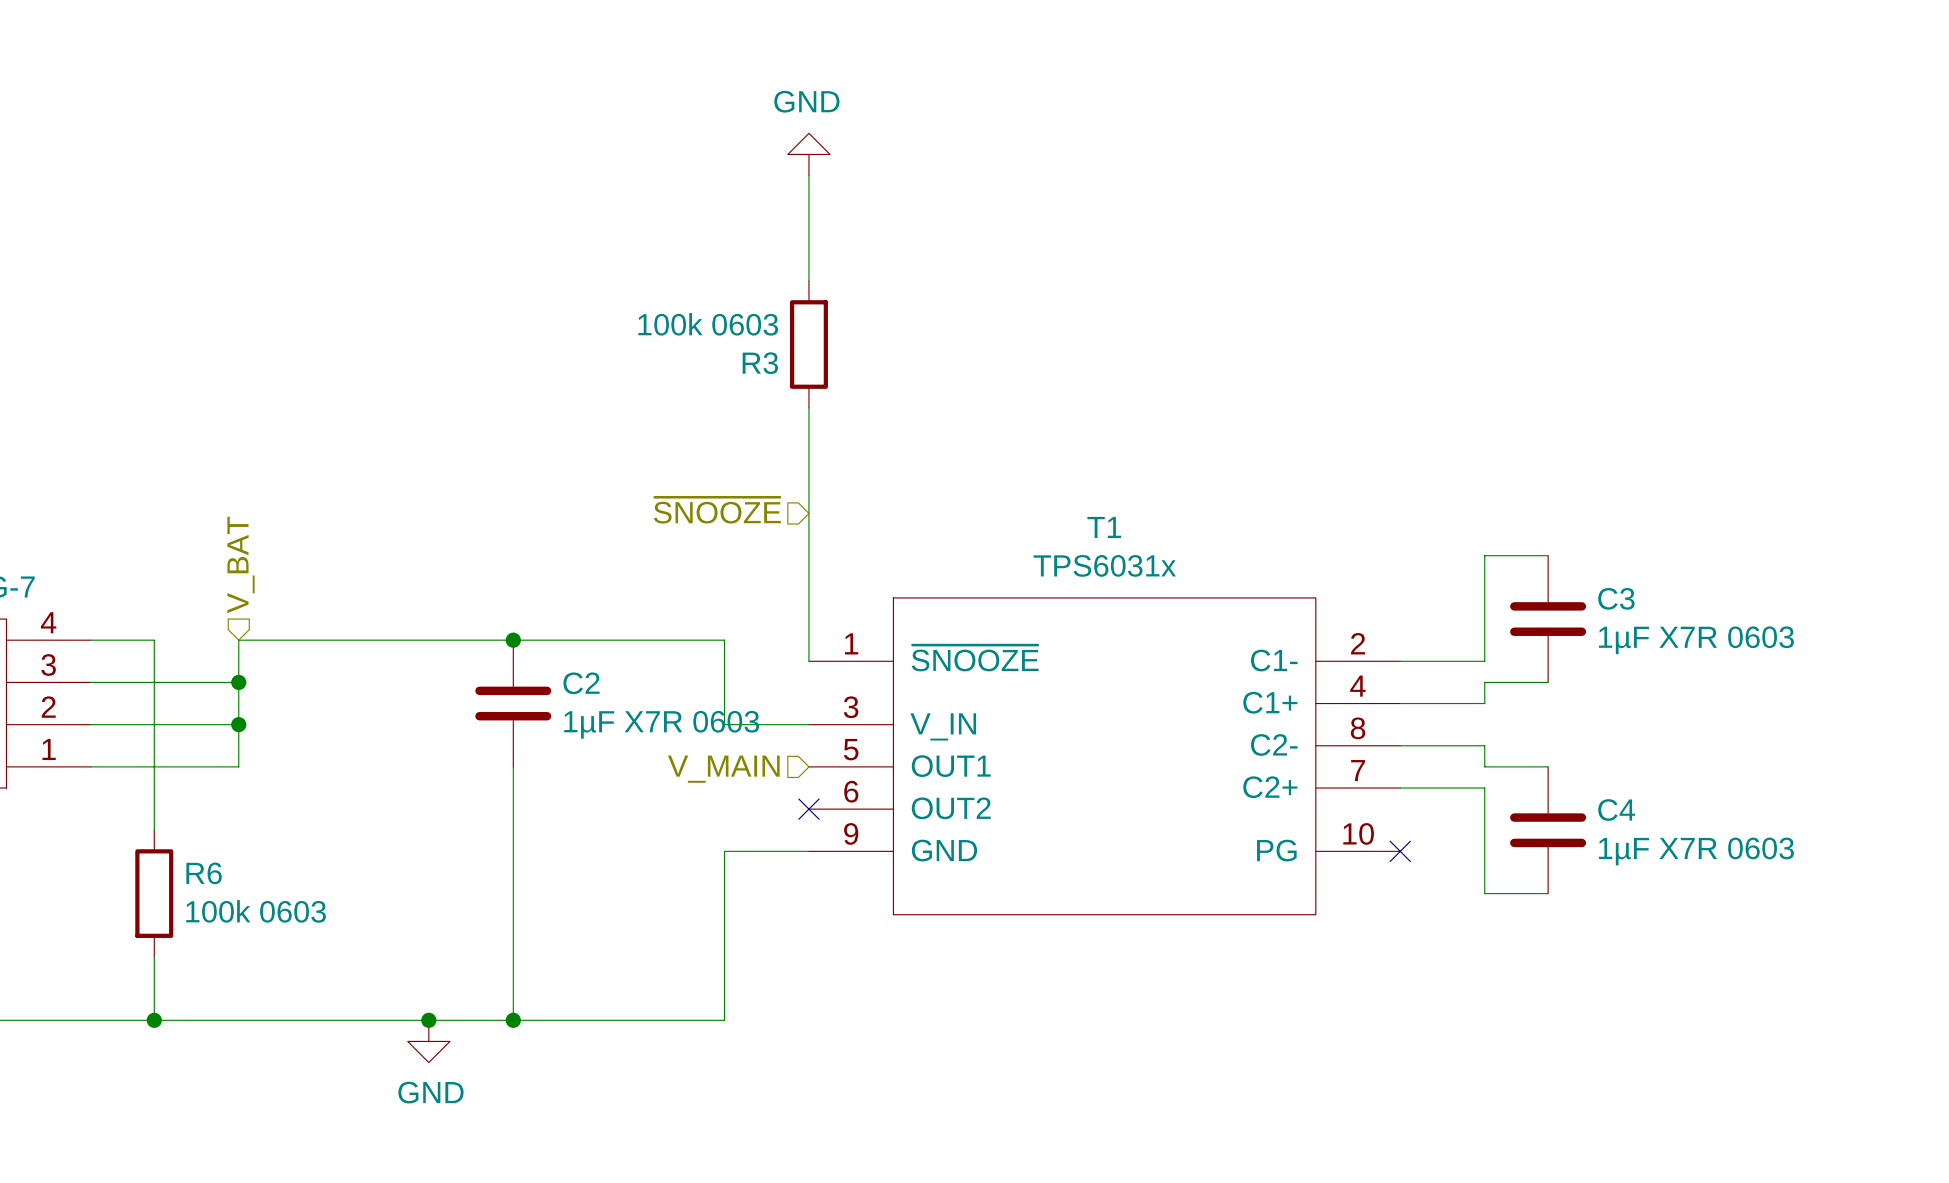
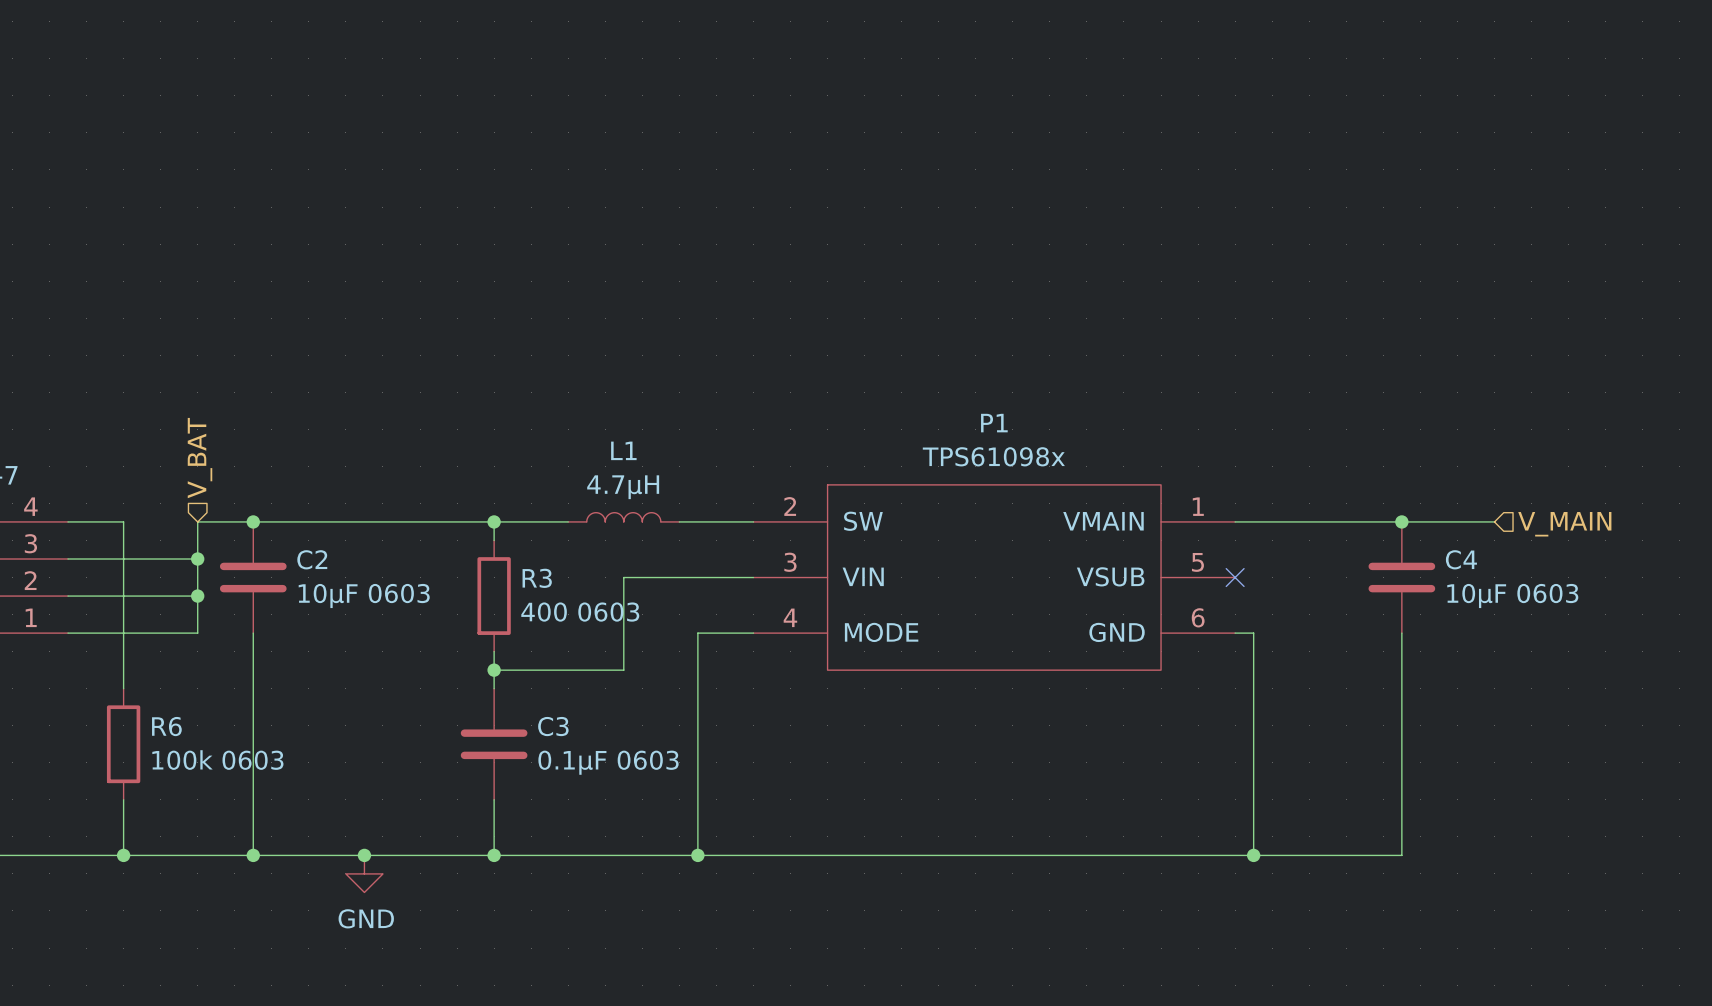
power symbol: GND (808, 154) -> none
wire: (808, 175) (808, 281) -> none
R3 value: 100k 0603 (708, 324) -> 400 0603 (580, 612)
R3 position: (808, 344) -> (494, 596)
R3 name position: R3 (760, 363) -> R3 (537, 578)
wire: (808, 407) (808, 661) -> none
hierarchical label: ~{SNOOZE} (717, 510) -> none
wire: (1548, 555) (1484, 555) (1484, 661) (1400, 661) -> none
C3 position: (1548, 619) -> (494, 744)
L1: none -> 4.7µH (623, 517)
junction: none -> (253, 521)
junction position: (513, 640) -> (494, 521)
wire: none -> (494, 521) (494, 540)
wire: (661, 640) (724, 640) (724, 703) -> (753, 577) (623, 577)
wire: none -> (679, 521) (753, 521)
wire: none -> (1235, 521) (1494, 521)
junction: none -> (1401, 521)
C3 value: 1µF X7R 0603 (1696, 640) -> 0.1µF 0603 (608, 762)
hierarchical label: none -> V_MAIN (1564, 524)
wire: (1548, 682) (1484, 682) (1484, 703) (1400, 703) -> none
C2 position: (513, 703) -> (253, 577)
P1: none -> TPS61098x (994, 577)
no-connect mark: none -> (1235, 577)
C2 value: 1µF X7R 0603 (661, 724) -> 10µF 0603 (364, 595)
wire: (724, 724) (808, 724) -> (623, 596) (623, 670) (494, 670)
wire: (1400, 745) (1484, 745) (1484, 766) (1548, 766) -> none
T1: TPS6031x (1104, 756) -> none
wire: (513, 766) (513, 1020) -> (253, 633) (253, 855)
wire: none -> (753, 633) (697, 633) (697, 855)
wire: none -> (1235, 633) (1253, 633) (1253, 855)
hierarchical label: V_MAIN (723, 769) -> none
wire: none -> (494, 651) (494, 688)
wire: (1400, 788) (1484, 788) (1484, 893) (1548, 893) -> none
junction: none -> (494, 670)
no-connect mark: (808, 809) -> none
C4 position: (1548, 830) -> (1401, 577)
wire: (808, 851) (724, 851) (724, 1020) -> (1401, 633) (1401, 855) (623, 855)
no-connect mark: (1400, 851) -> none
C4 value: 1µF X7R 0603 (1696, 851) -> 10µF 0603 (1512, 595)
wire: none -> (494, 799) (494, 855)
junction: none -> (253, 855)
junction position: (513, 1020) -> (494, 855)
junction: none -> (697, 855)
junction: none -> (1253, 855)

